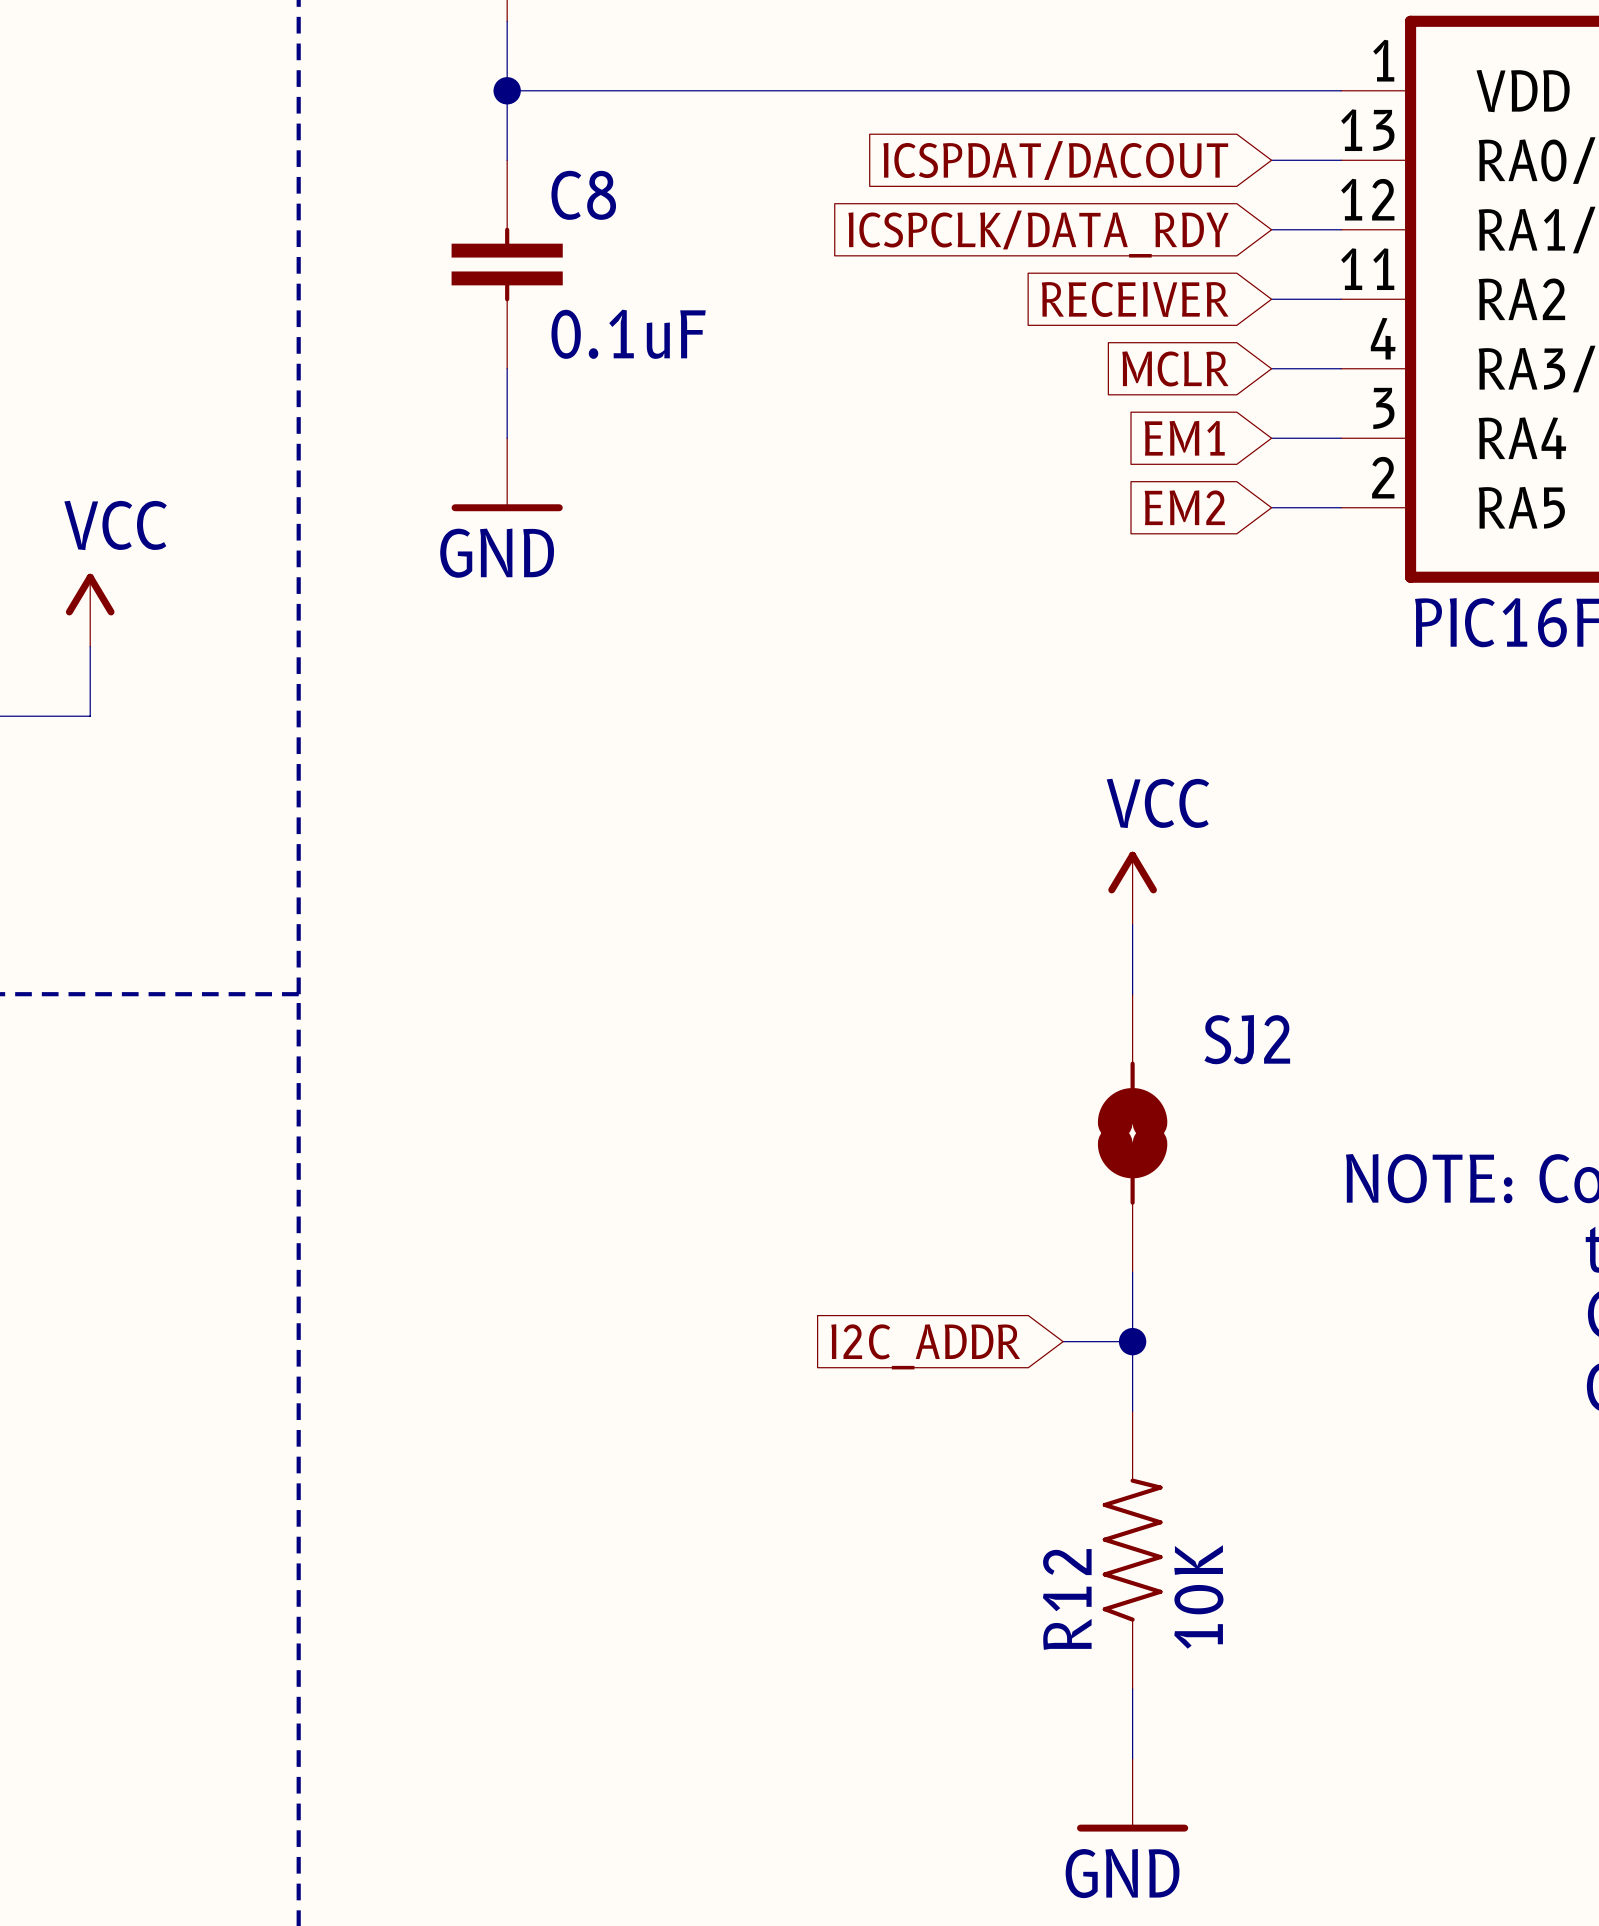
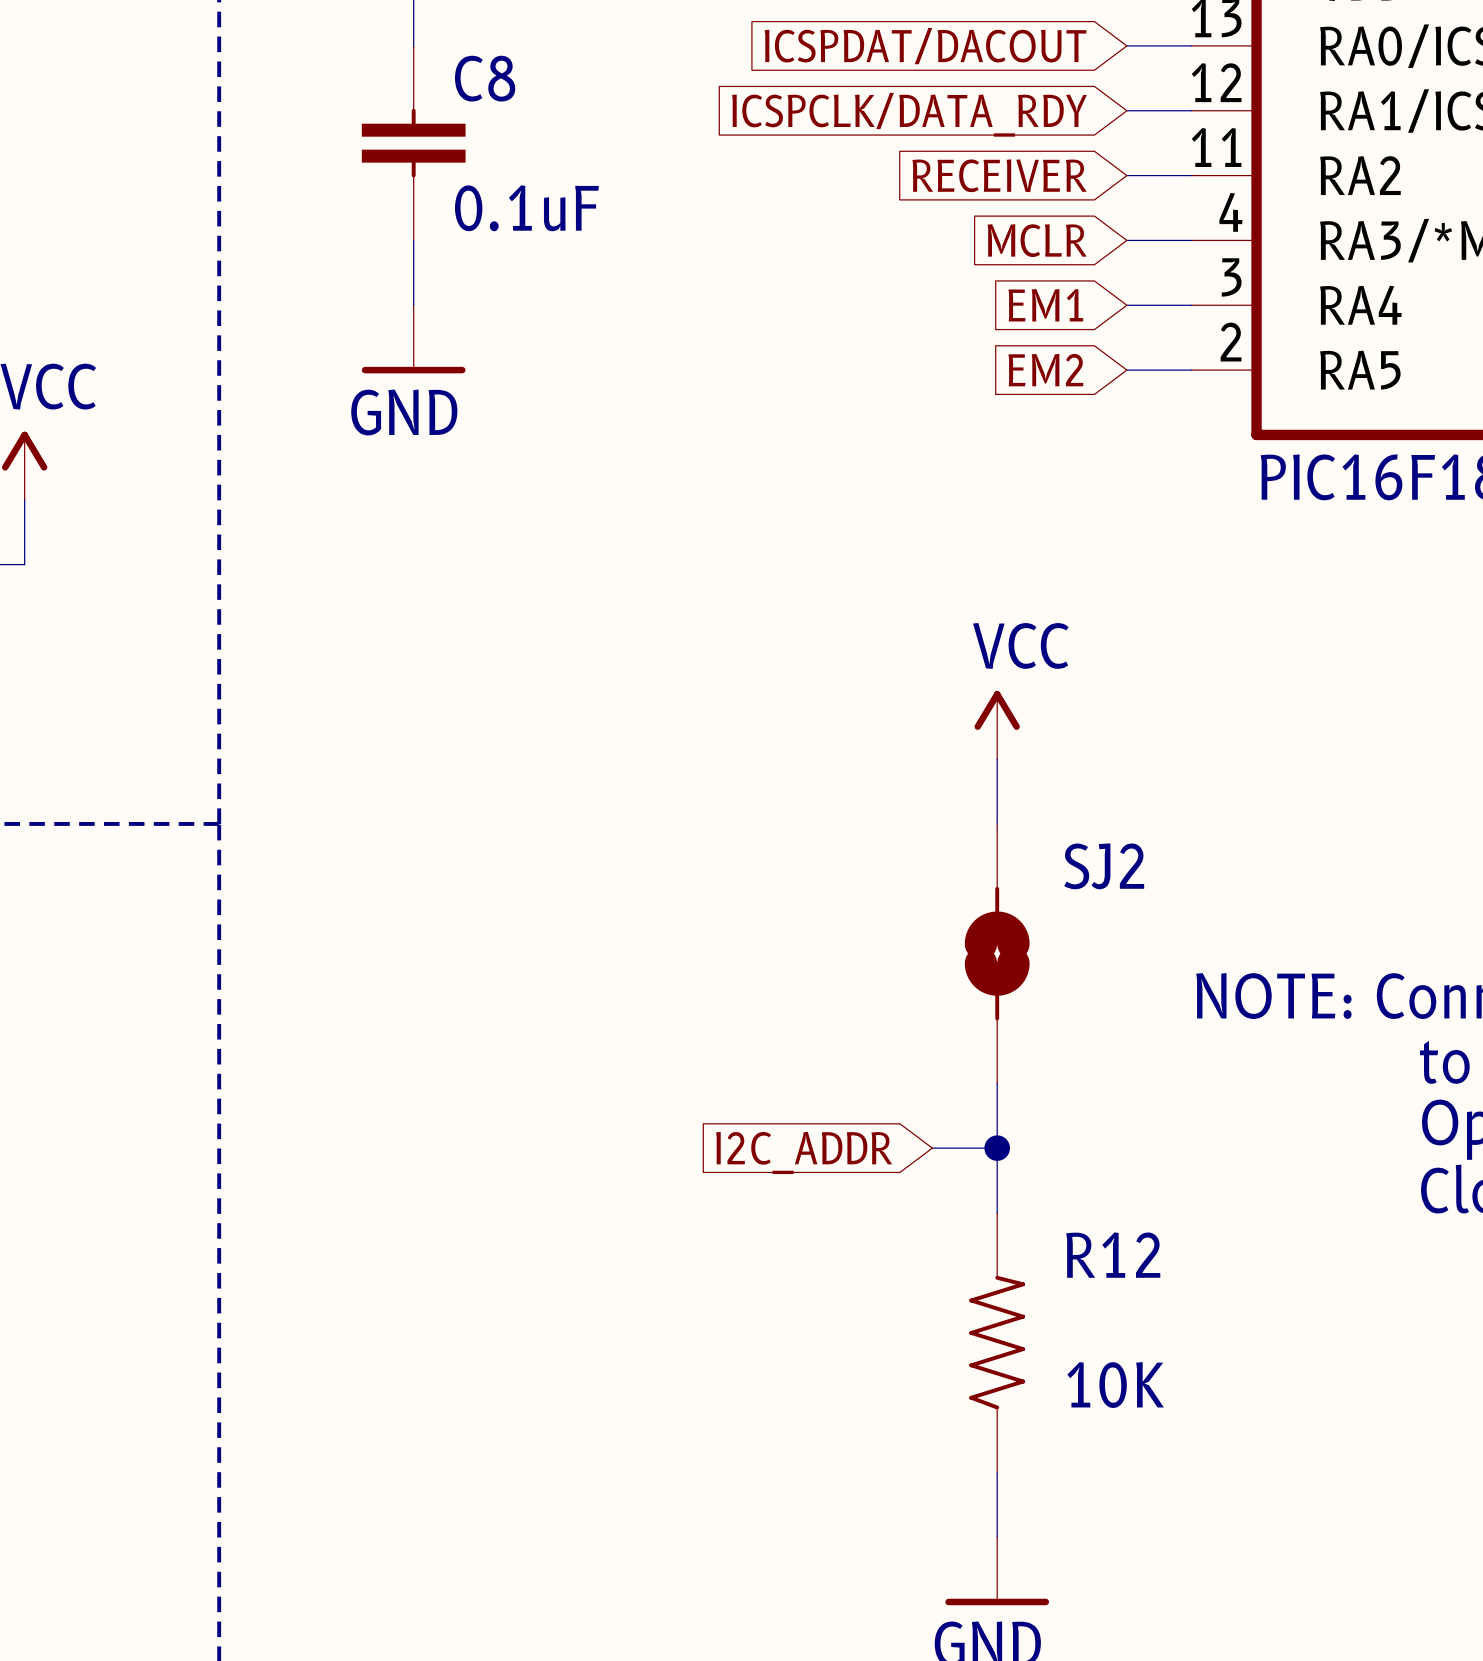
R12 value rotation: 0° (1198, 1596) -> 90° clockwise (1115, 1385)
R12 name rotation: 0° (1067, 1599) -> 90° clockwise (1113, 1255)
R12 name position: R12 (1067, 1599) -> R12 (1113, 1255)

